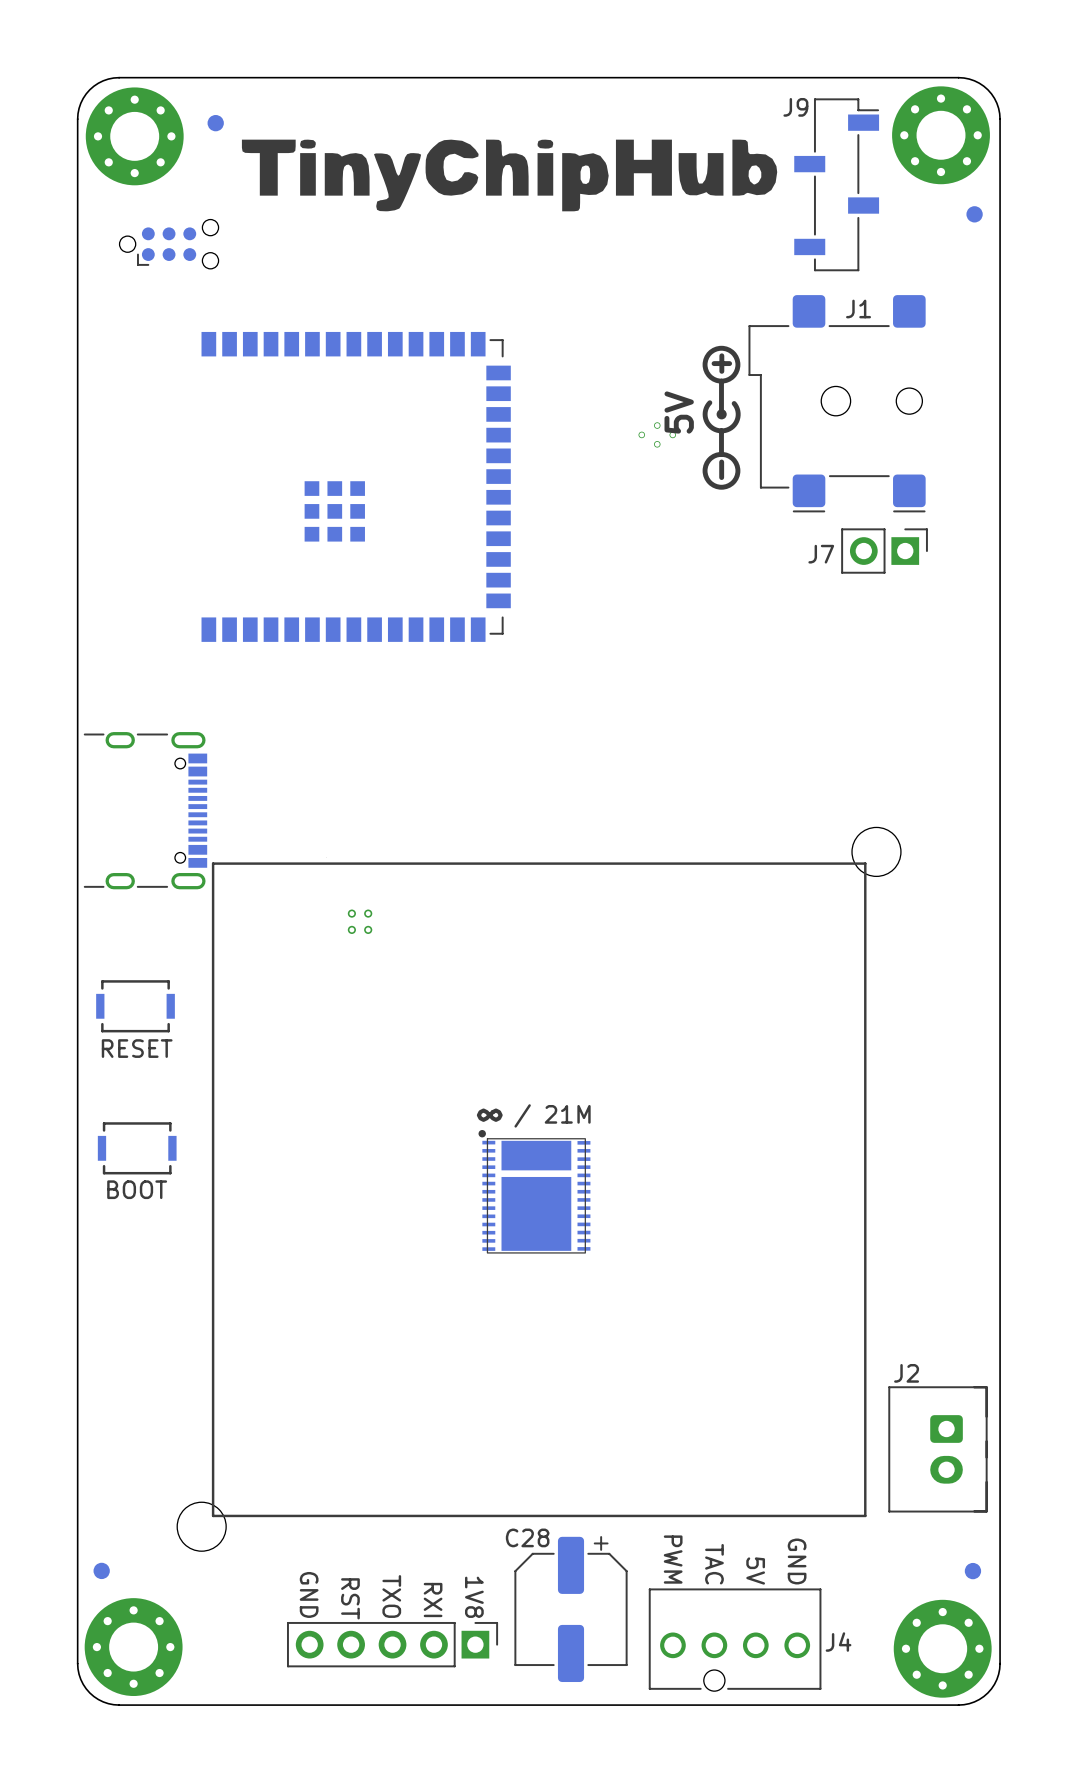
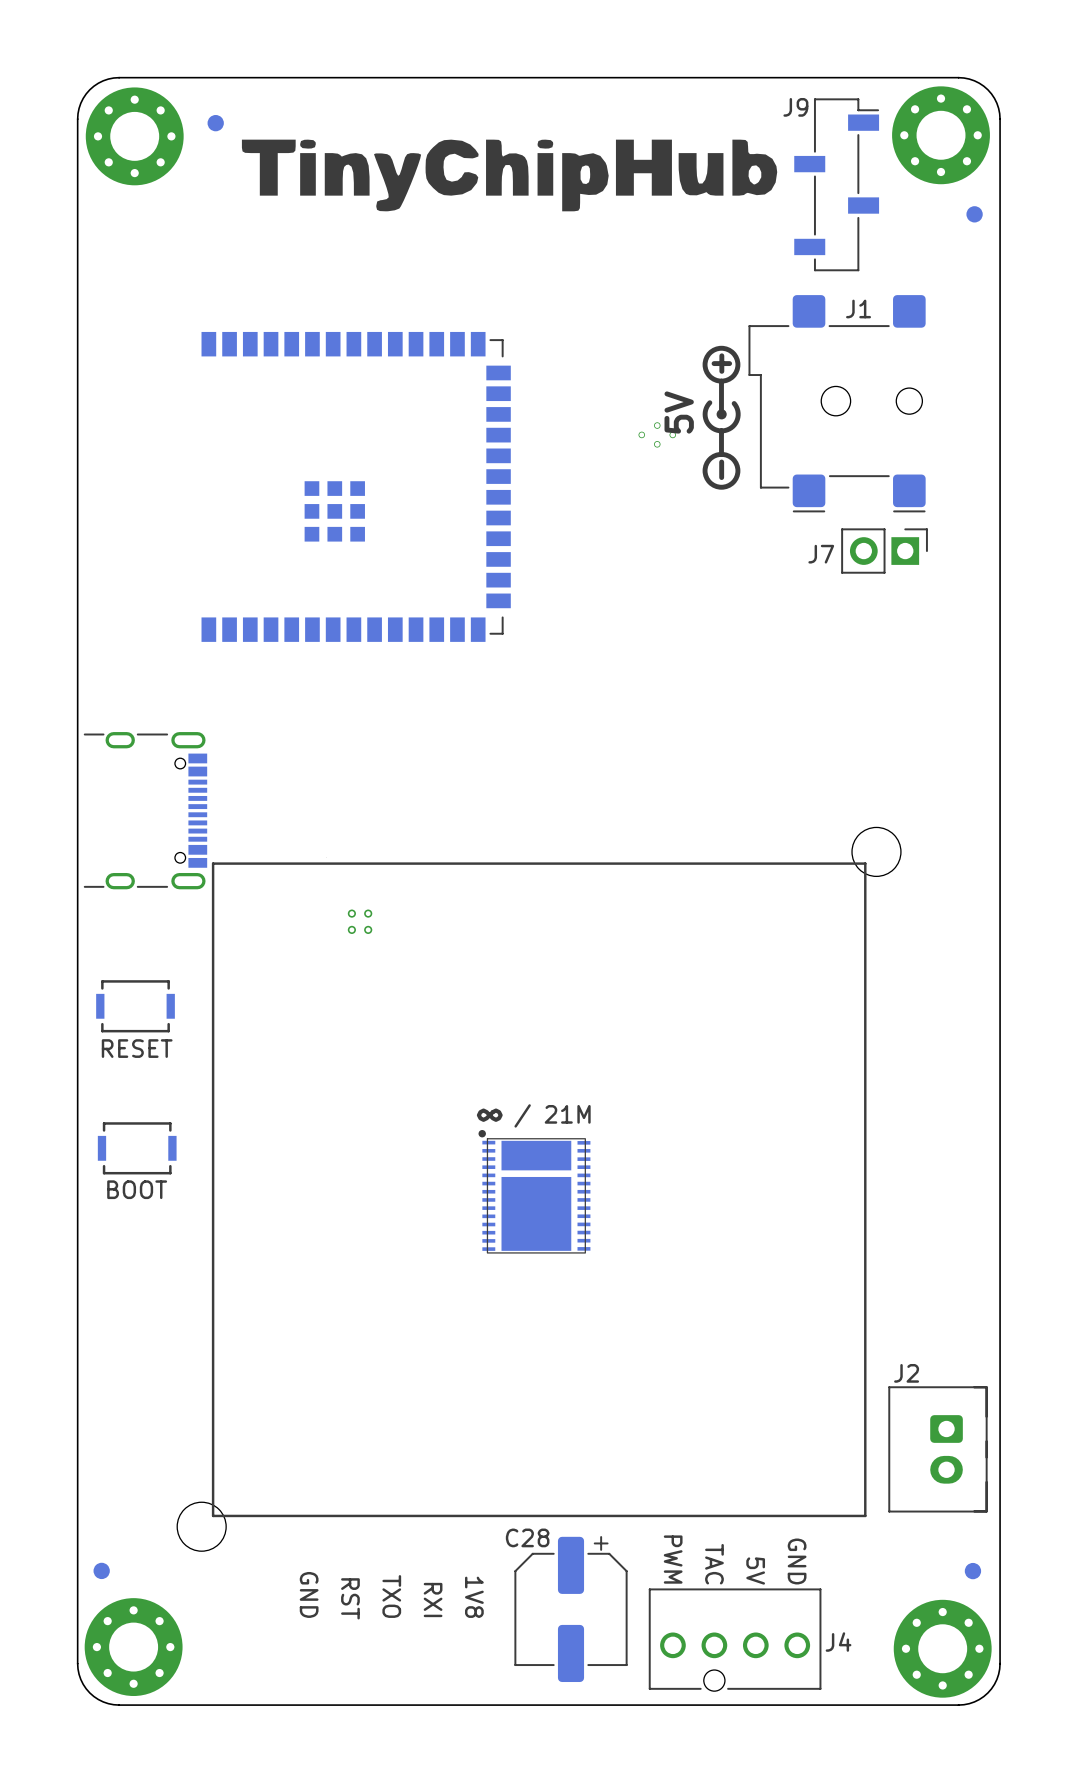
part: (169, 244) -> none
part: (392, 1644) -> none

